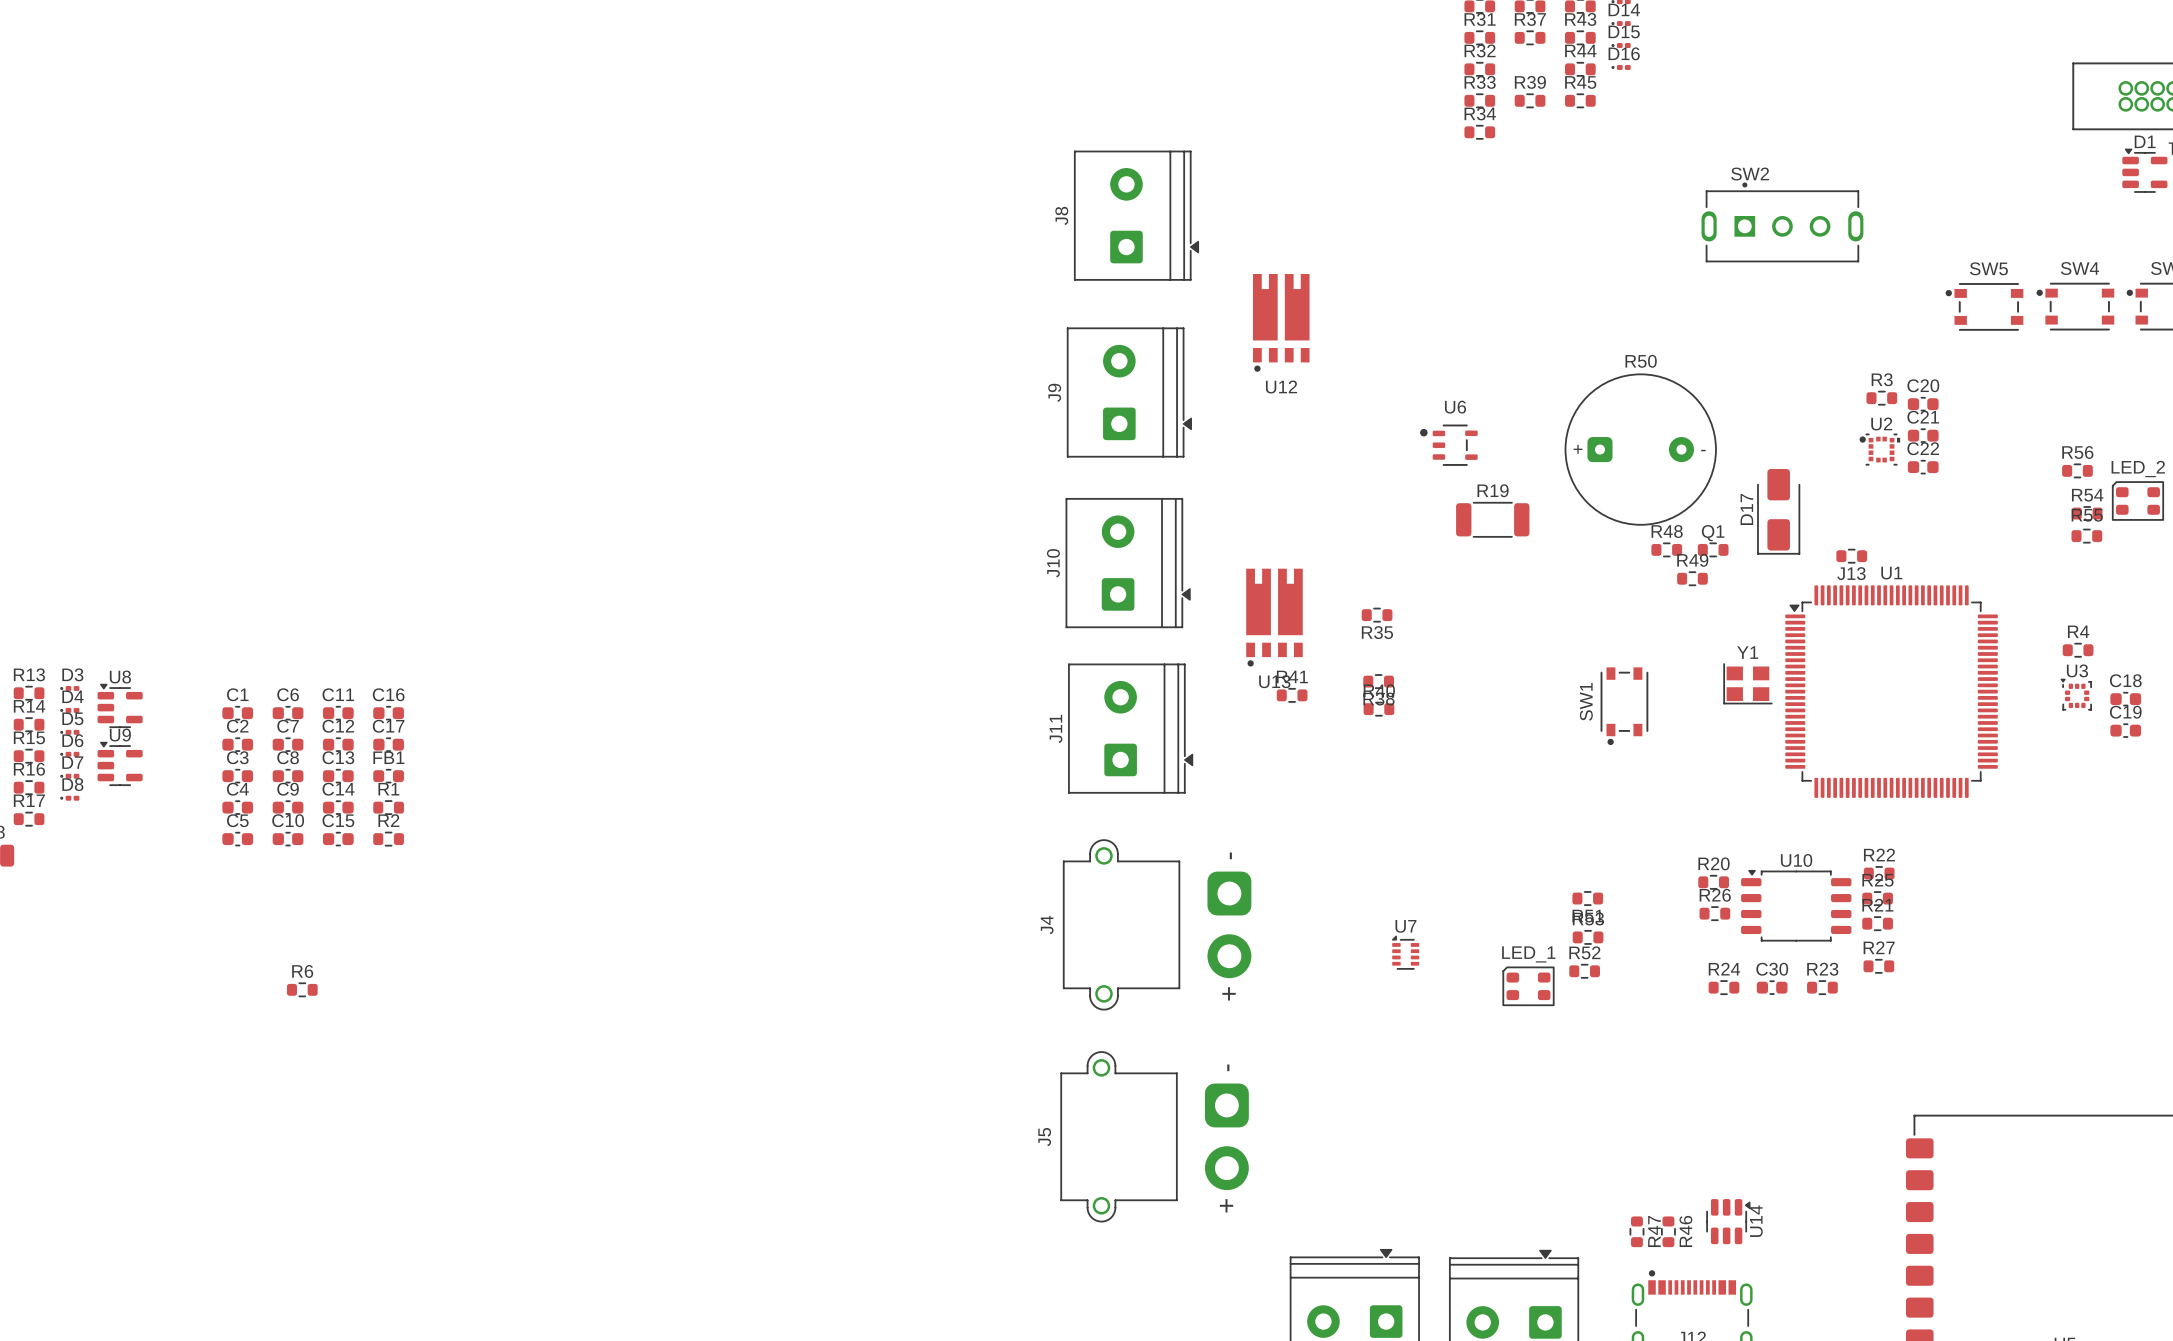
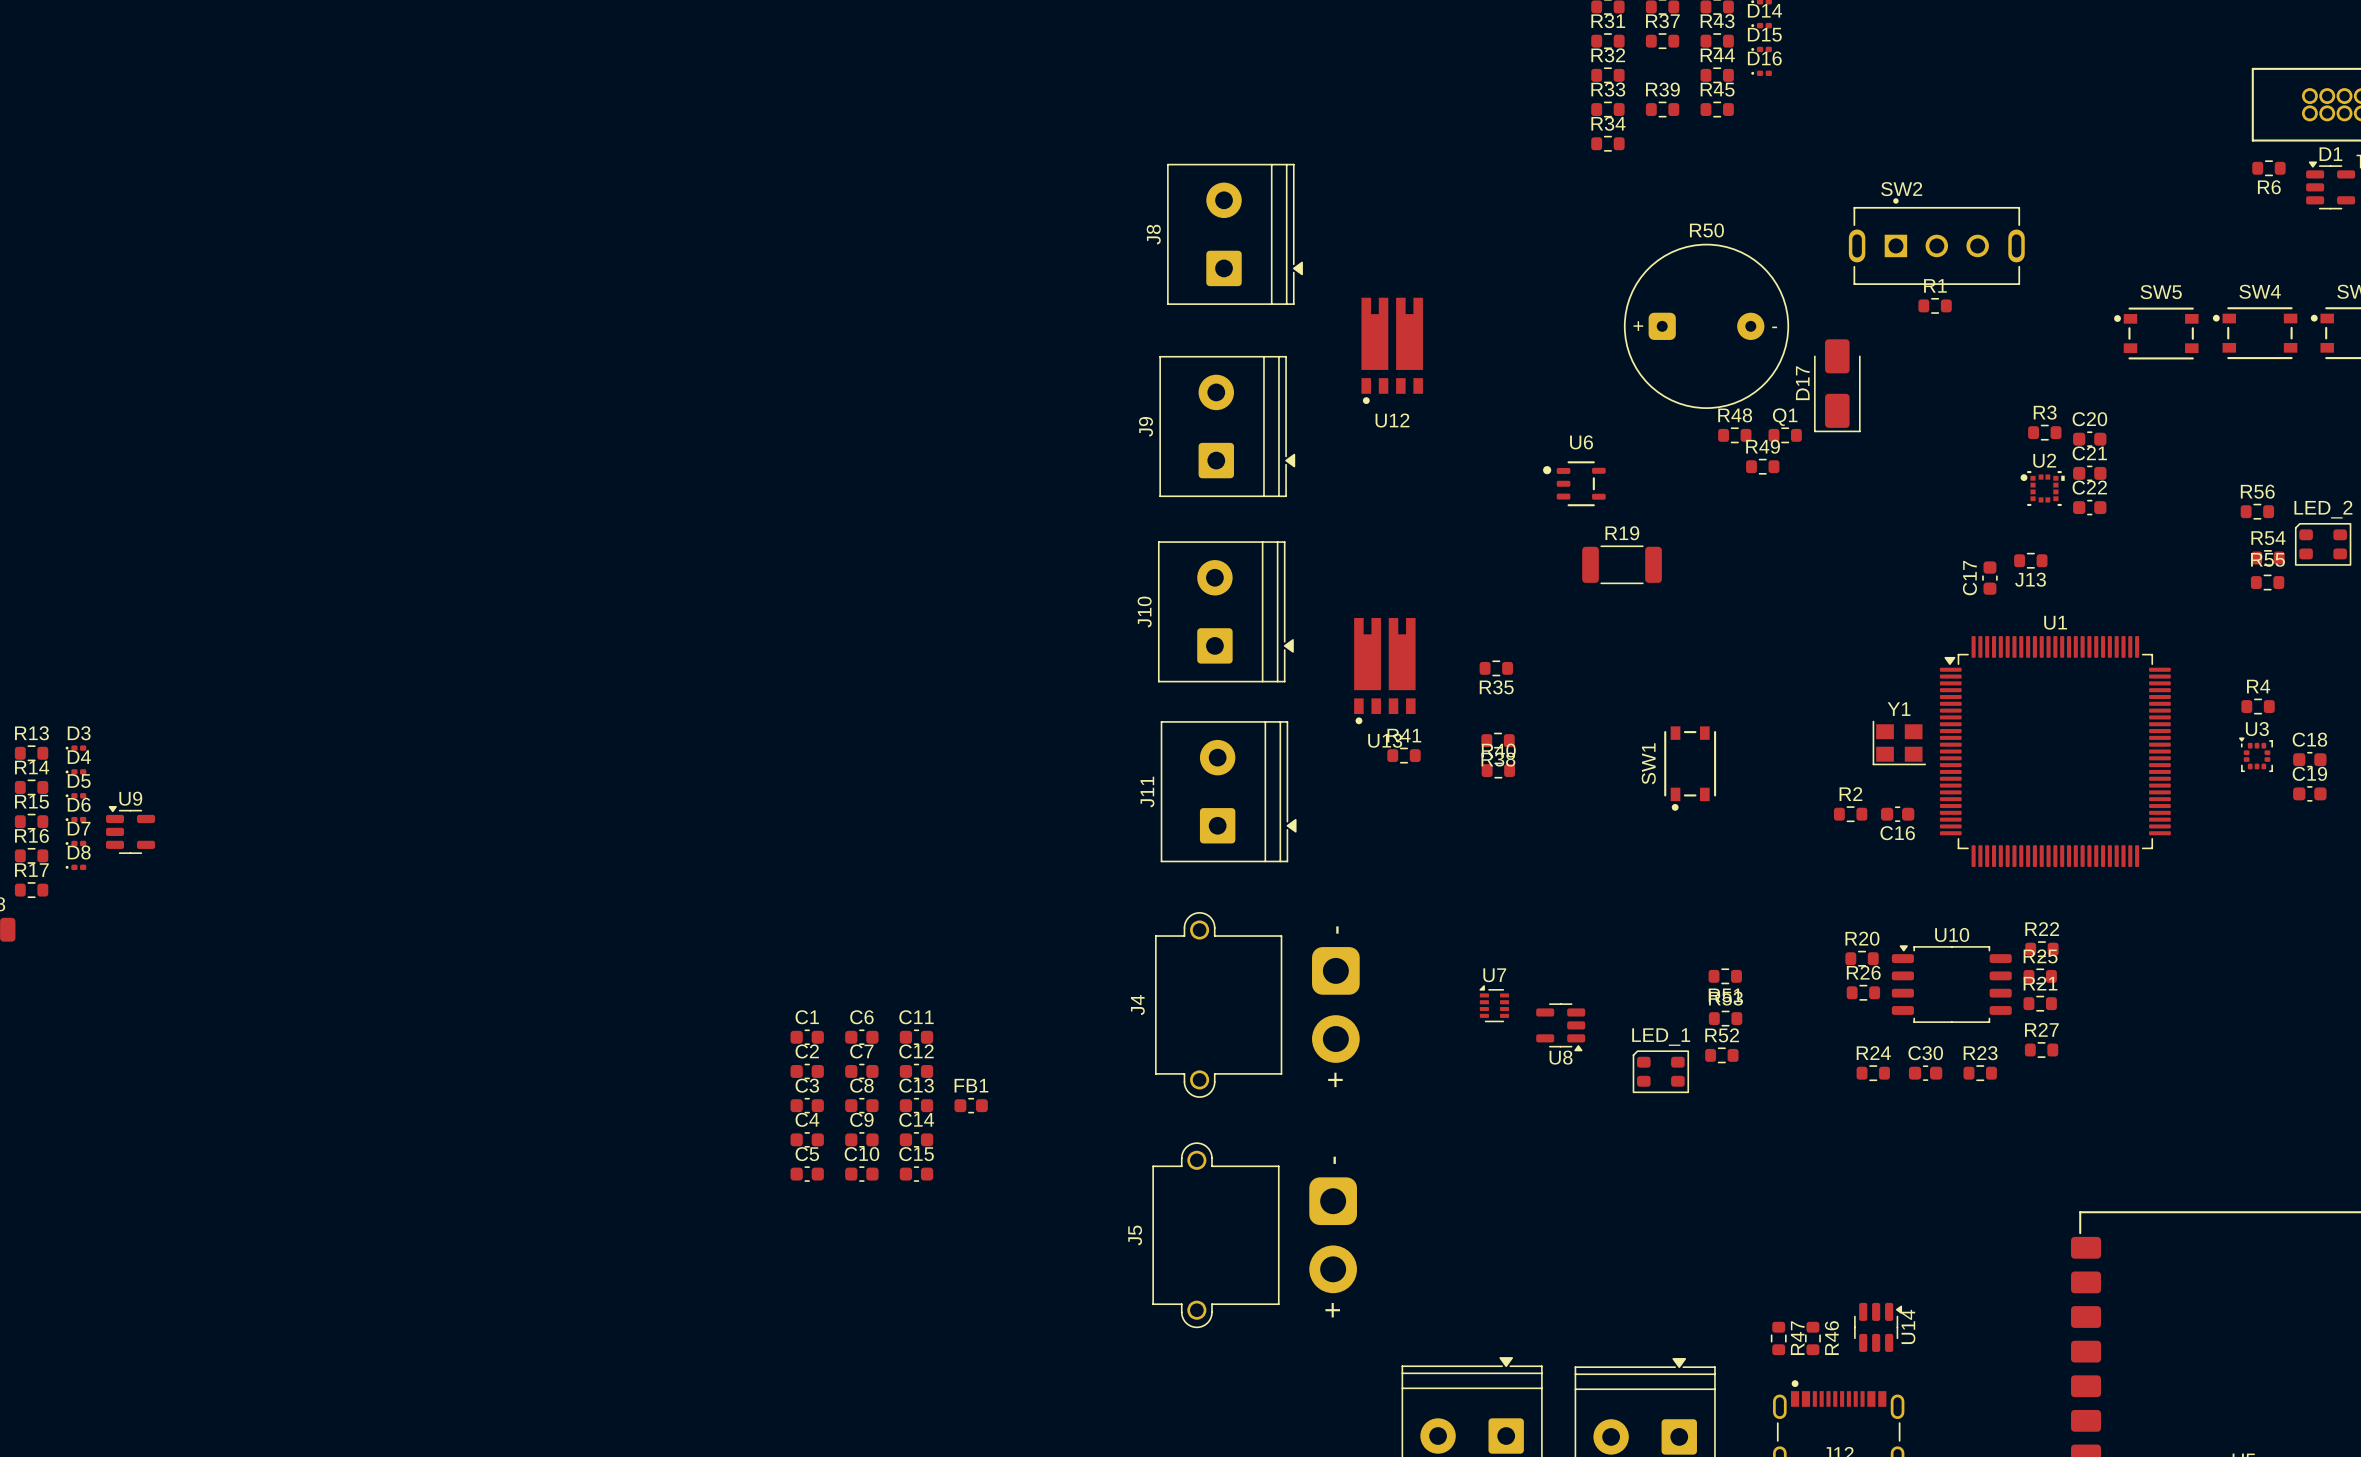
R50 position: (1640, 449) -> (1706, 326)
D17 position: (1778, 511) -> (1837, 385)
R48 position: (1666, 549) -> (1734, 435)
Q1 position: (1713, 549) -> (1785, 435)
J13 position: (1851, 556) -> (2030, 560)
R49 position: (1692, 578) -> (1762, 466)
C16 name position: C16 (388, 694) -> C16 (1897, 833)
U8 rotation: 0° (120, 705) -> 180° (1560, 1027)
U8 position: (120, 705) -> (1560, 1027)
SW1 position: (1624, 706) -> (1690, 768)
C1 position: (237, 713) -> (807, 1037)
C6 position: (288, 713) -> (861, 1037)
C11 position: (338, 713) -> (916, 1037)
C16 position: (388, 713) -> (1897, 814)
C17 name position: C17 (388, 726) -> C17 (1969, 578)
C2 position: (237, 744) -> (807, 1071)
C7 position: (288, 744) -> (861, 1071)
C12 position: (338, 744) -> (916, 1071)
C17 rotation: 0° (388, 744) -> 90° clockwise (1989, 578)
C17 position: (388, 744) -> (1989, 578)
C3 position: (237, 776) -> (807, 1105)
C8 position: (288, 776) -> (861, 1105)
C13 position: (338, 776) -> (916, 1105)
FB1 position: (388, 776) -> (971, 1105)
C4 position: (237, 807) -> (807, 1139)
C9 position: (288, 807) -> (861, 1139)
C14 position: (338, 807) -> (916, 1139)
R1 position: (388, 807) -> (1935, 305)
C5 position: (237, 839) -> (807, 1174)
C10 position: (288, 839) -> (861, 1174)
C15 position: (338, 839) -> (916, 1174)
R2 position: (388, 839) -> (1850, 814)
U7 position: (1405, 952) -> (1494, 1003)
R6 name position: R6 (302, 971) -> R6 (2269, 187)
R6 position: (302, 989) -> (2268, 168)

